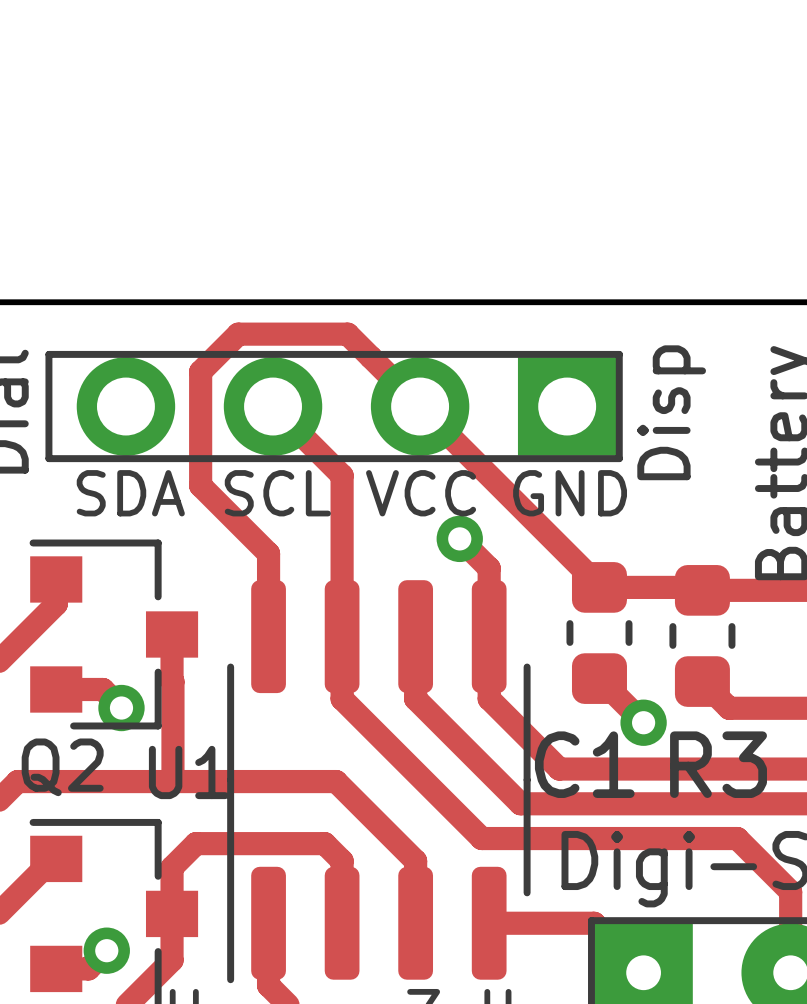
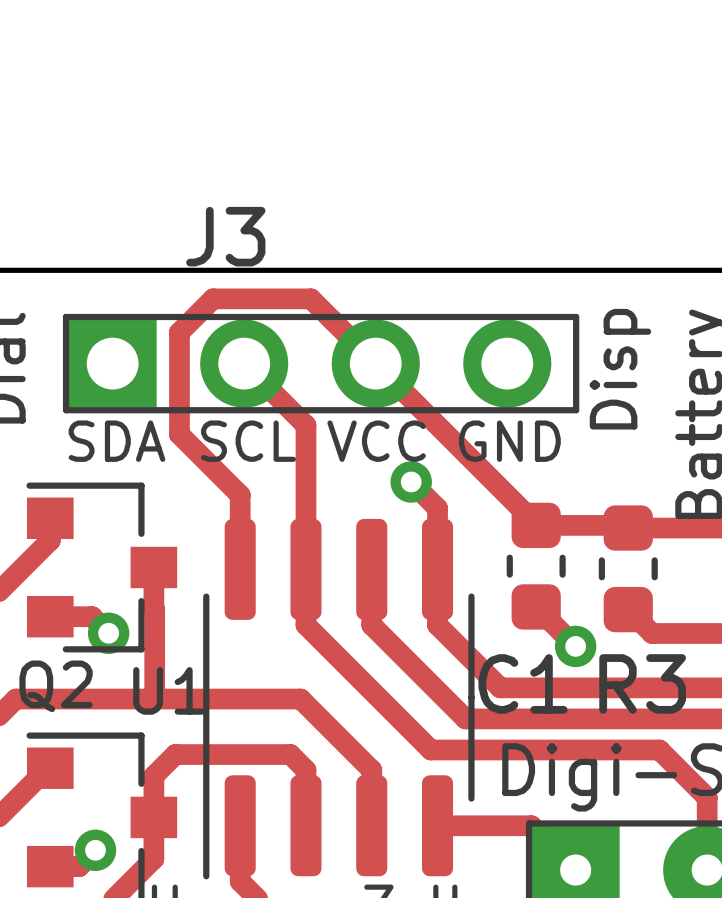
part: Disp (334, 406) -> none
J3: none -> Disp (321, 363)

